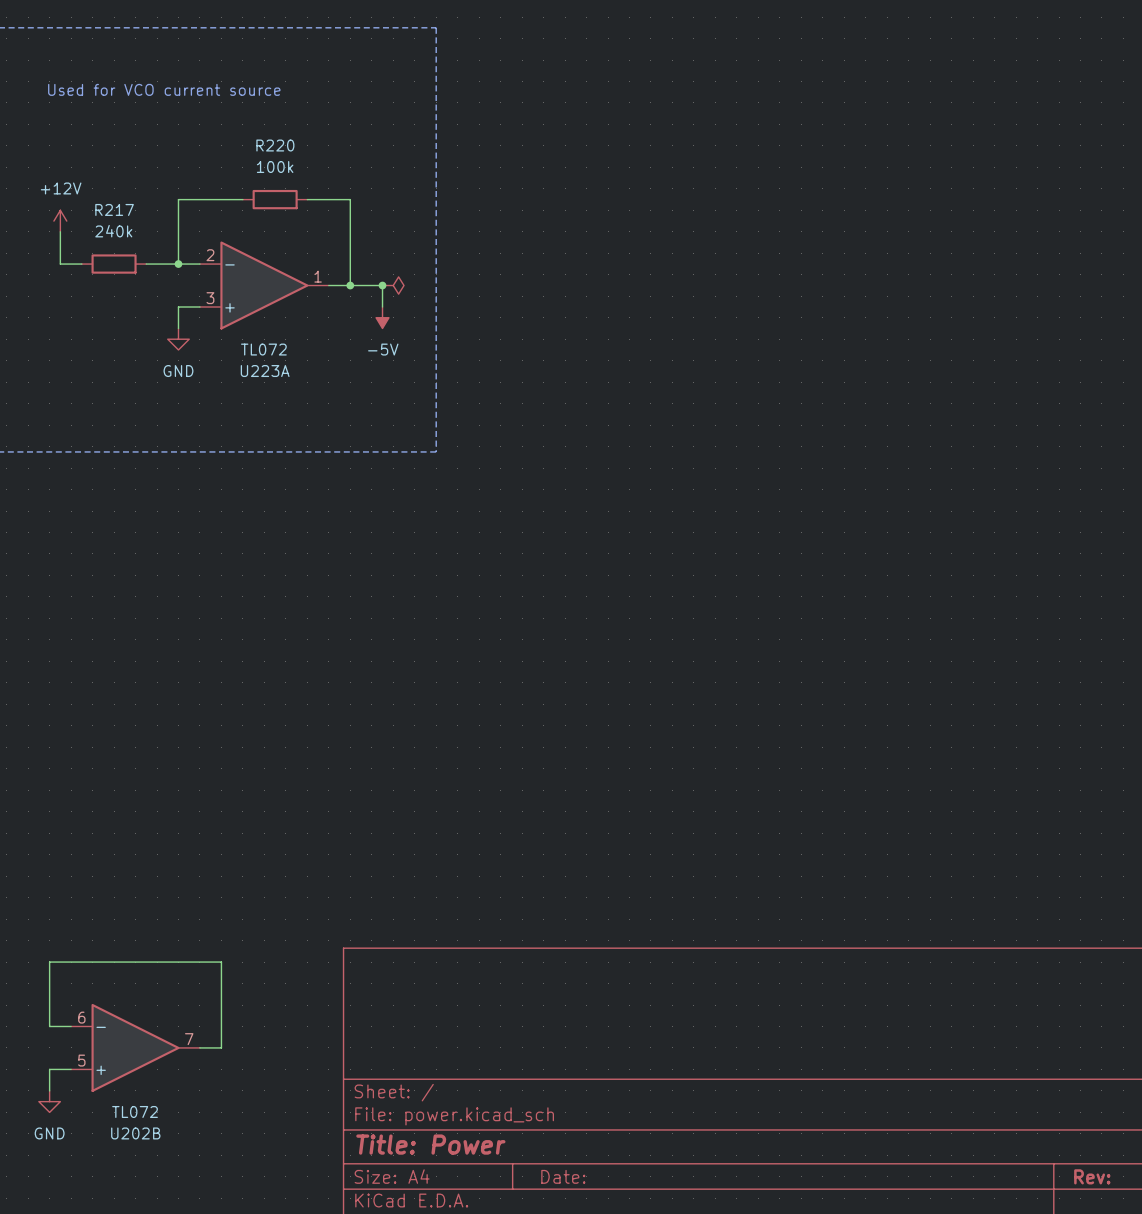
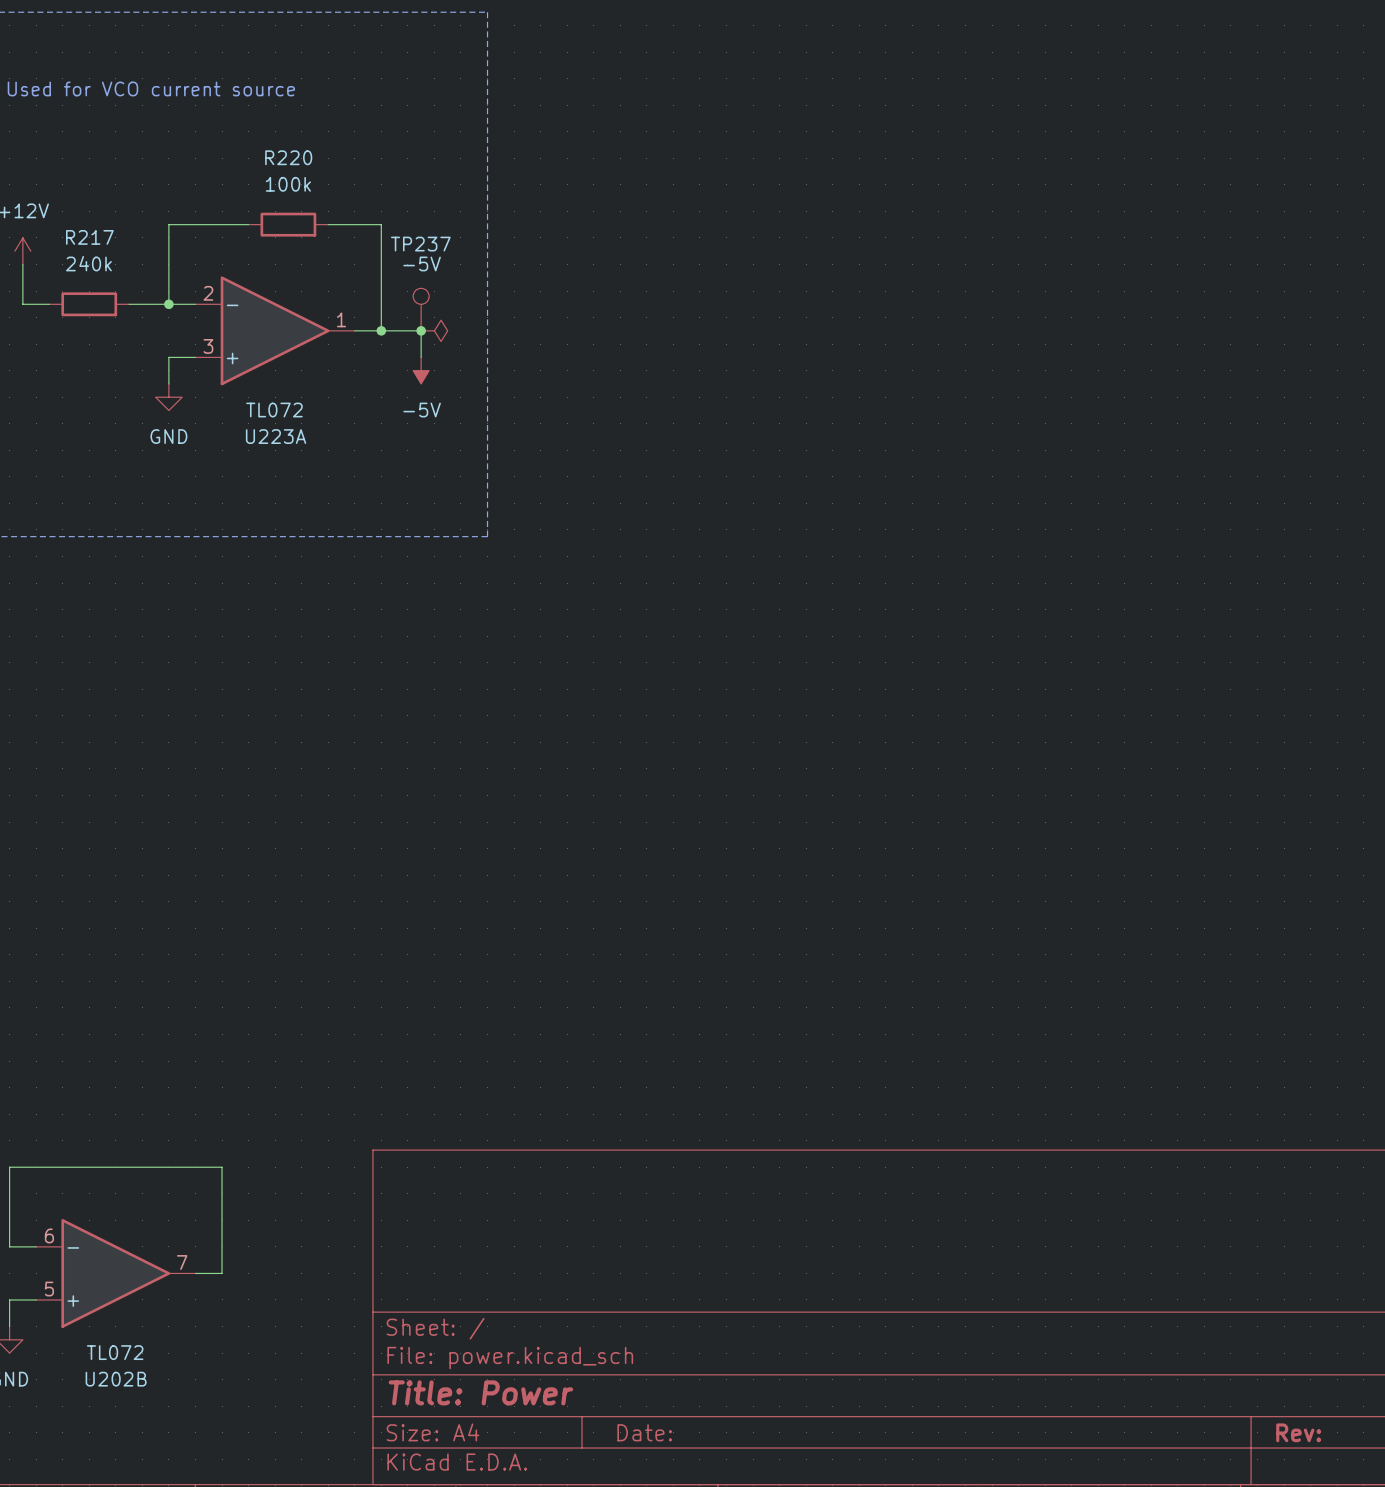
TP237: none -> -5V (421, 309)

